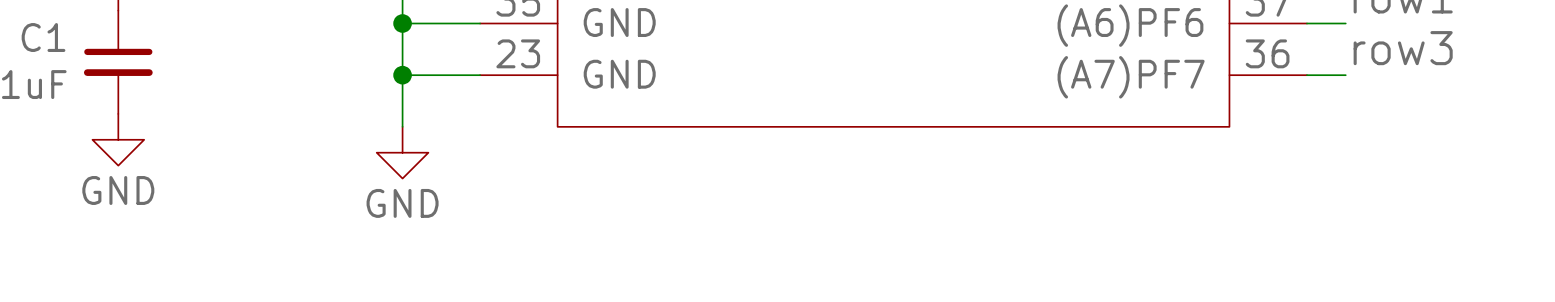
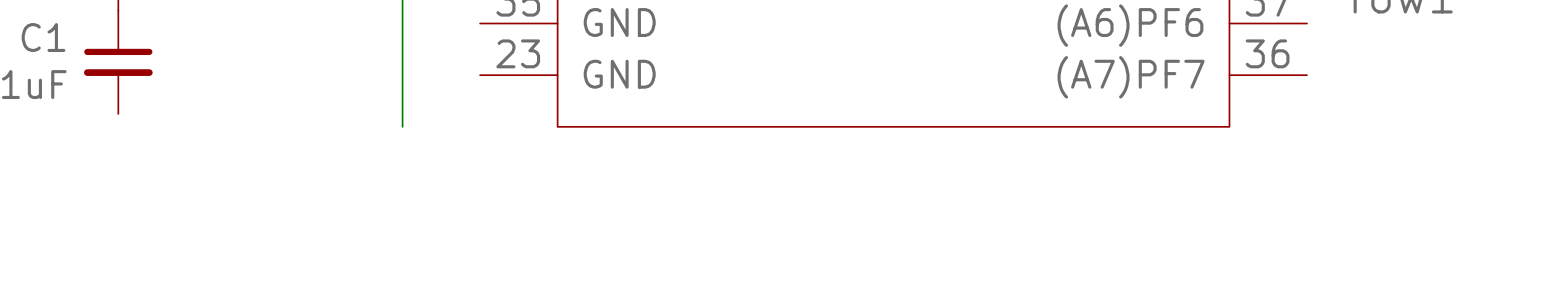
wire: (402, 23) (480, 23) -> none
junction: (402, 23) -> none
wire: (1306, 23) (1345, 23) -> none
label: row3 (1403, 48) -> none
wire: (402, 75) (480, 75) -> none
junction: (402, 75) -> none
wire: (1306, 75) (1345, 75) -> none
power symbol: GND (118, 139) -> none
power symbol: GND (402, 152) -> none

